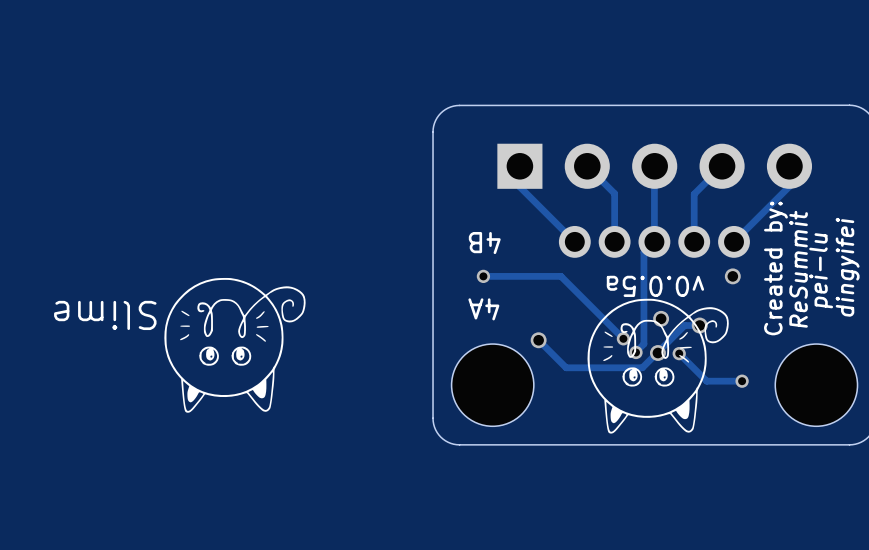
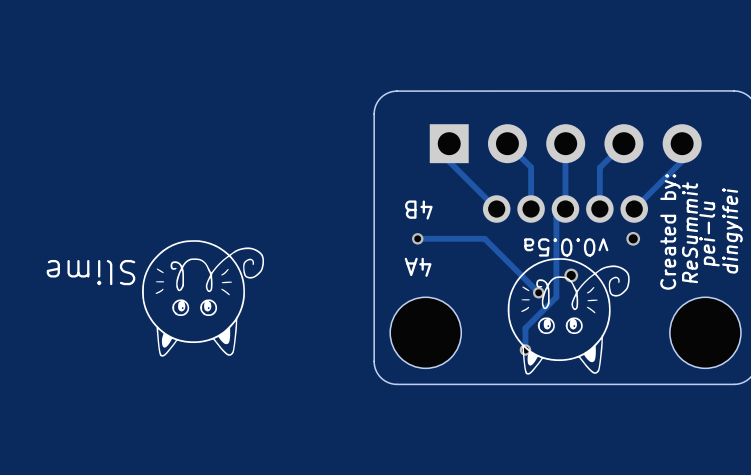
track: (699, 325) (684, 325) (642, 367) (566, 367) (538, 340) -> none
via: (699, 325) -> none
via: (538, 340) -> none
track: none -> (549, 304) (525, 328) (525, 350)
via: (636, 352) -> none
via: (657, 353) -> none
track: (679, 353) (706, 381) (742, 381) -> none
via: (679, 353) -> none
via: (742, 381) -> none
via: none -> (525, 350)

